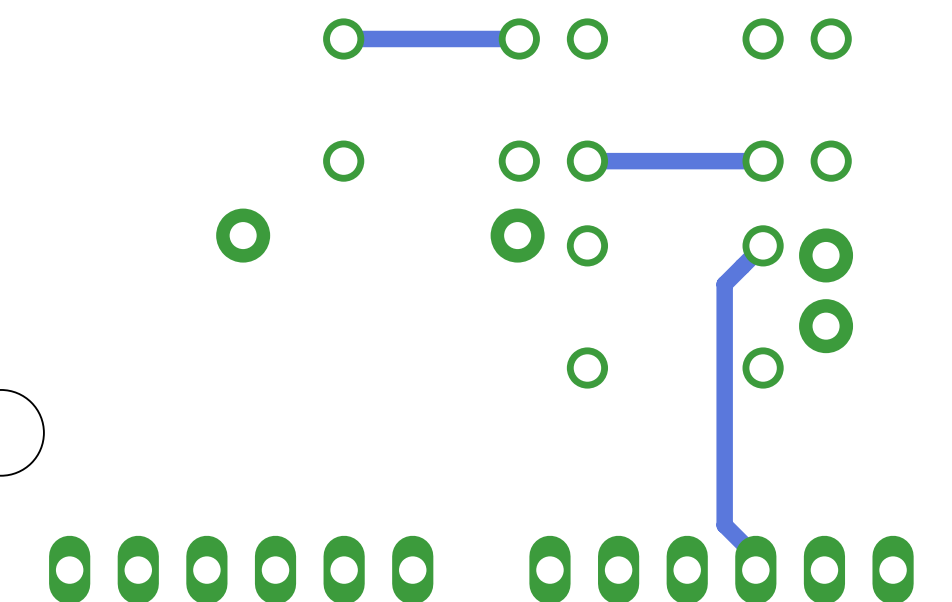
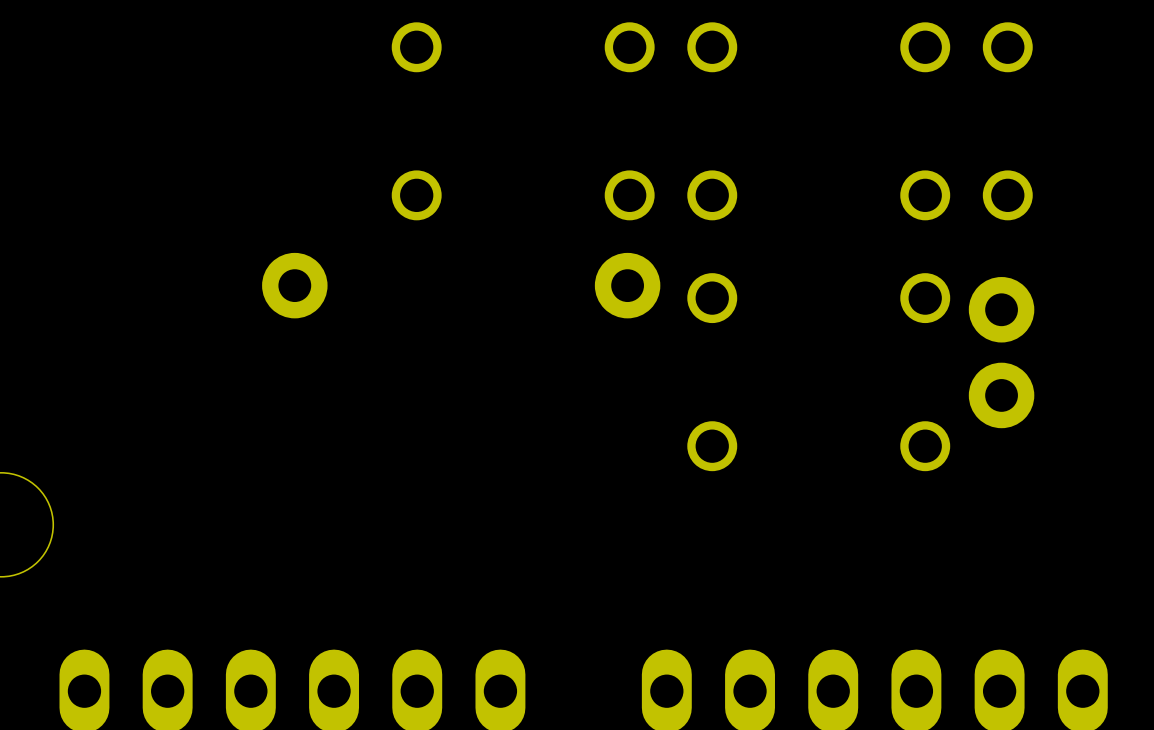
track: (519, 38) (343, 38) -> none
track: (763, 161) (587, 161) -> none
track: (763, 245) (724, 284) (724, 525) (755, 556) (755, 570) -> none

